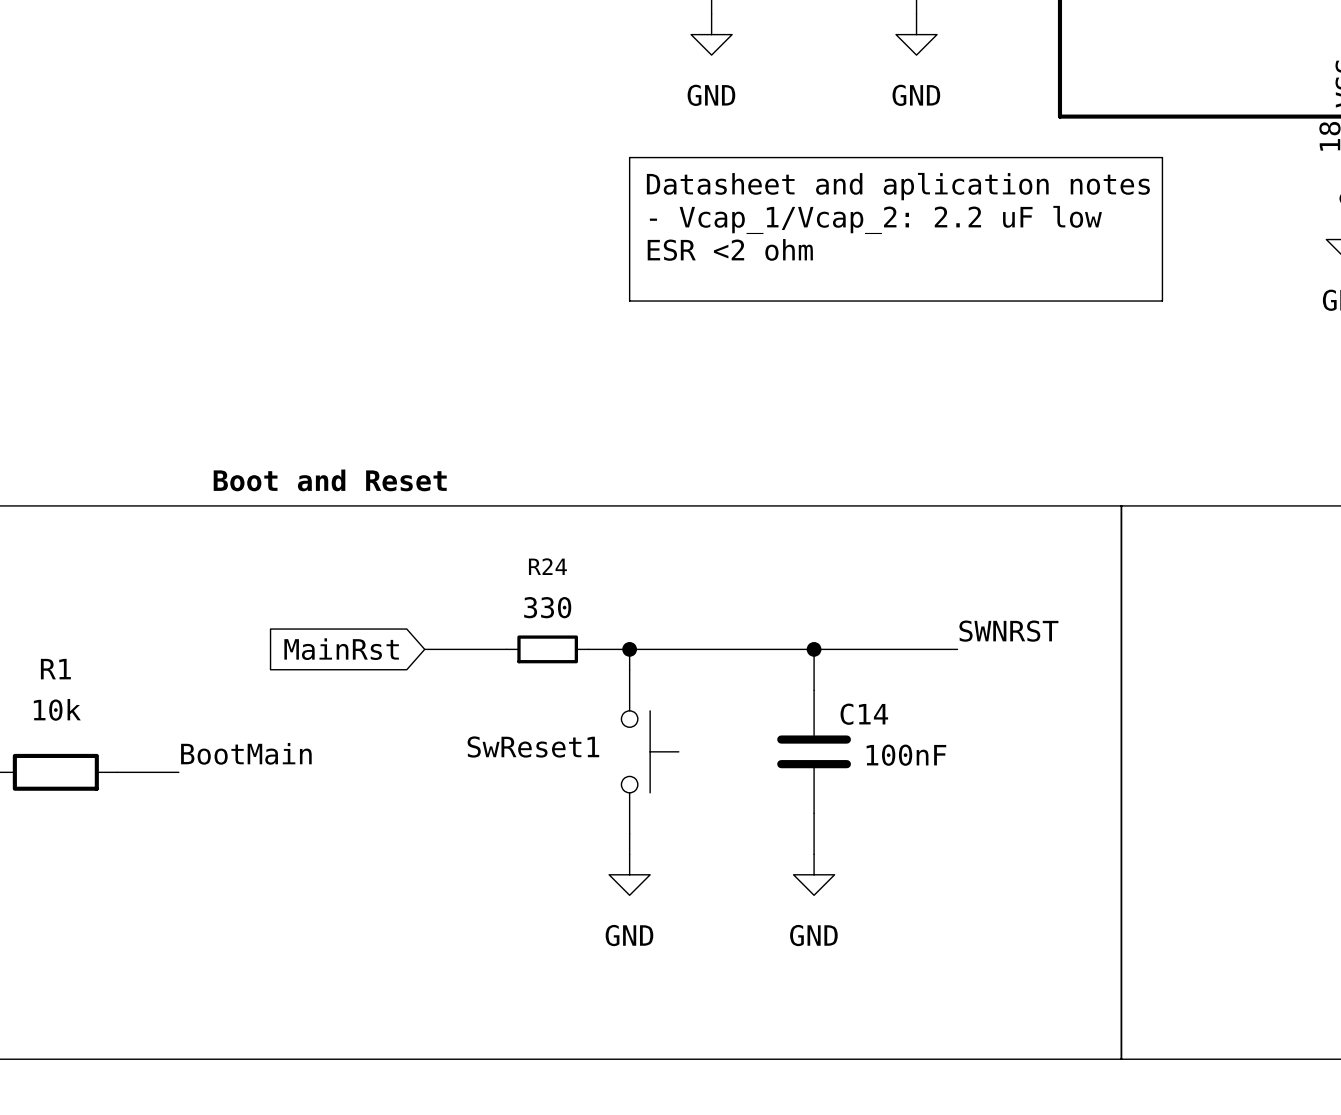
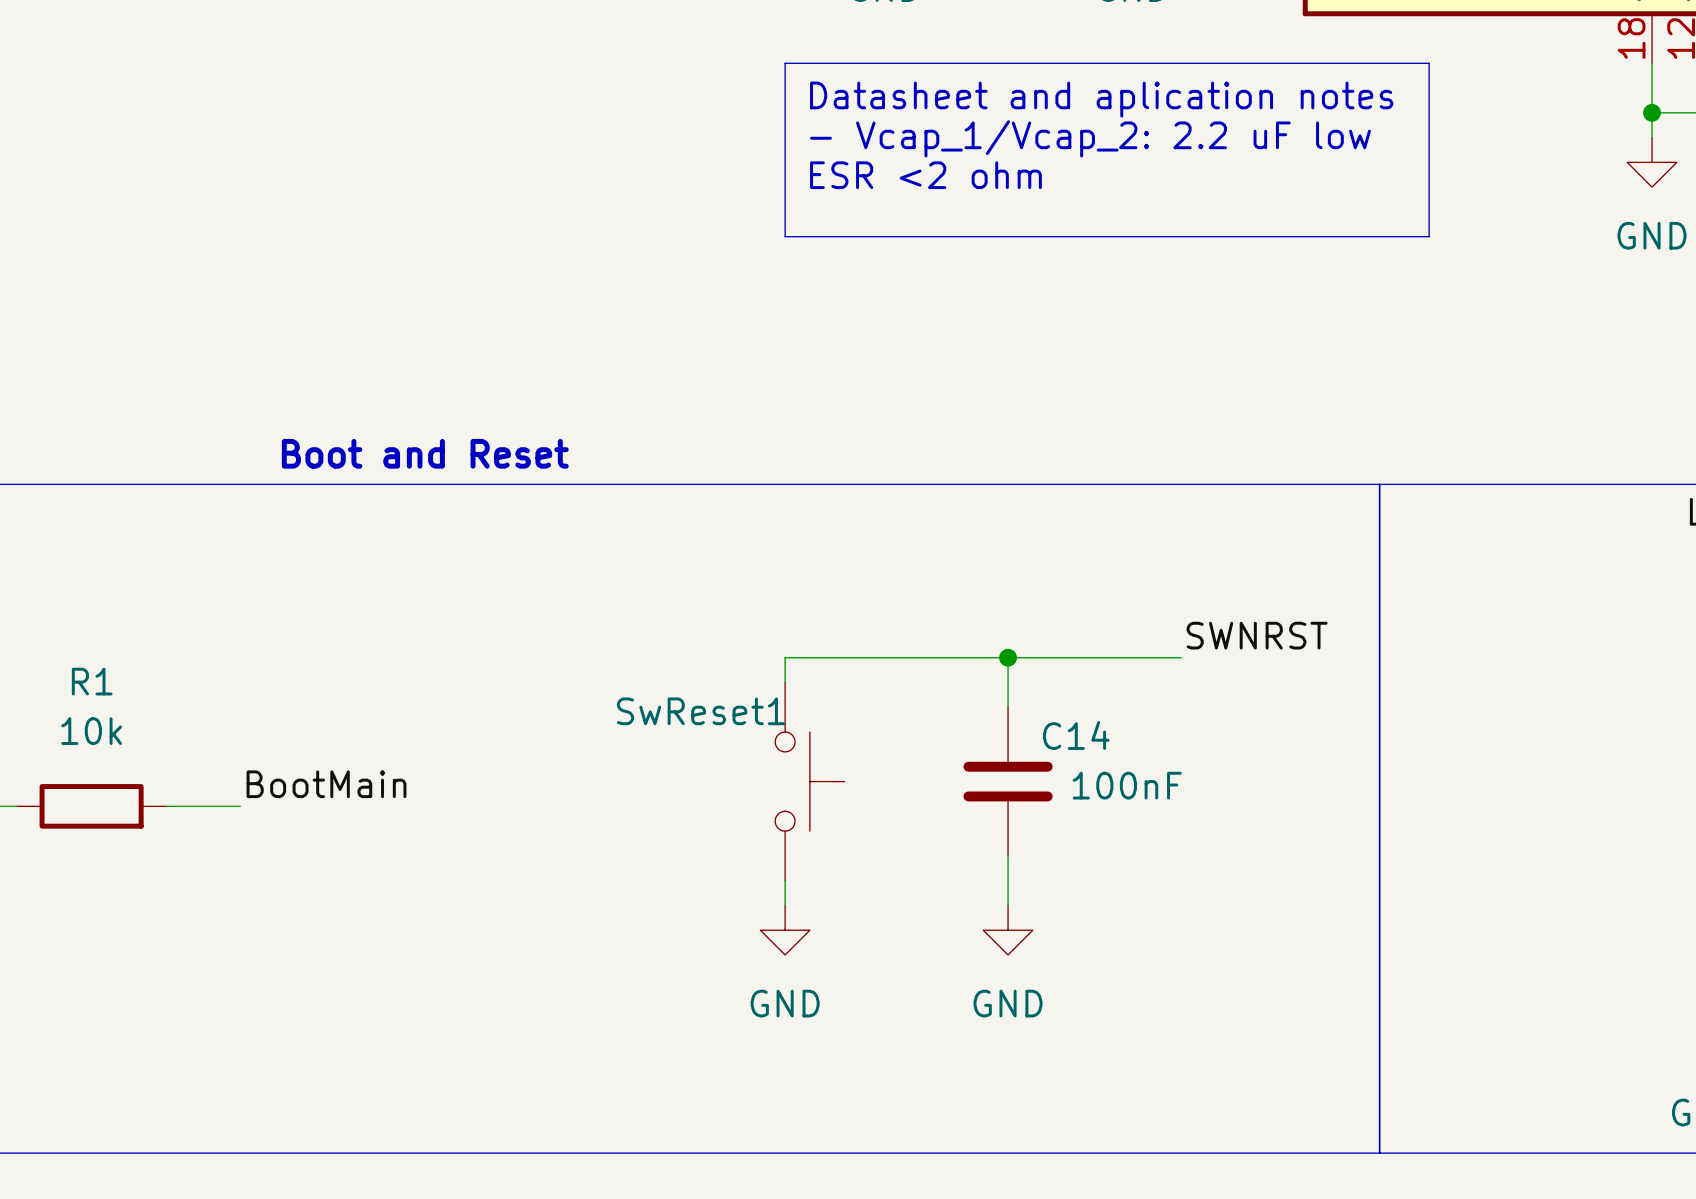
global label: MainRst (341, 649) -> none
wire: (424, 649) (506, 649) -> none
R24: 330 (547, 649) -> none
wire: (588, 649) (629, 649) -> none
junction: (629, 649) -> none
SwReset1 name position: SwReset1 (533, 747) -> SwReset1 (700, 711)

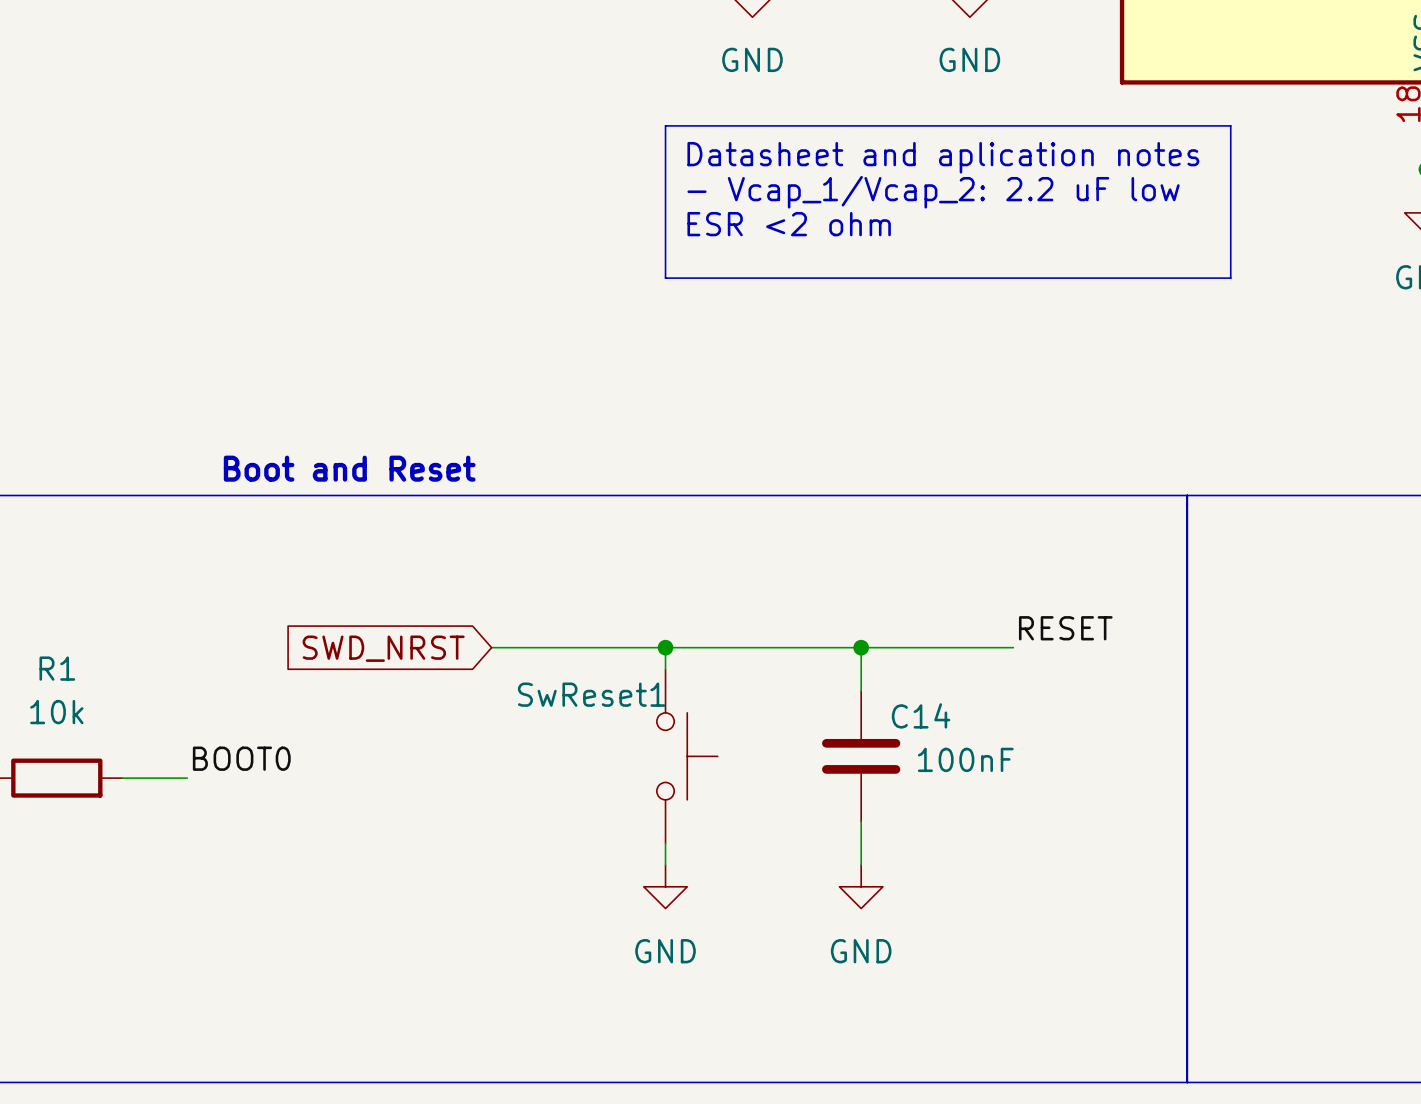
label: SWNRST (1257, 635) -> RESET (1065, 628)
wire: none -> (491, 647) (665, 647)
junction: none -> (665, 647)
global label: none -> SWD_NRST (383, 648)
label: BootMain (326, 784) -> BOOT0 (241, 758)

